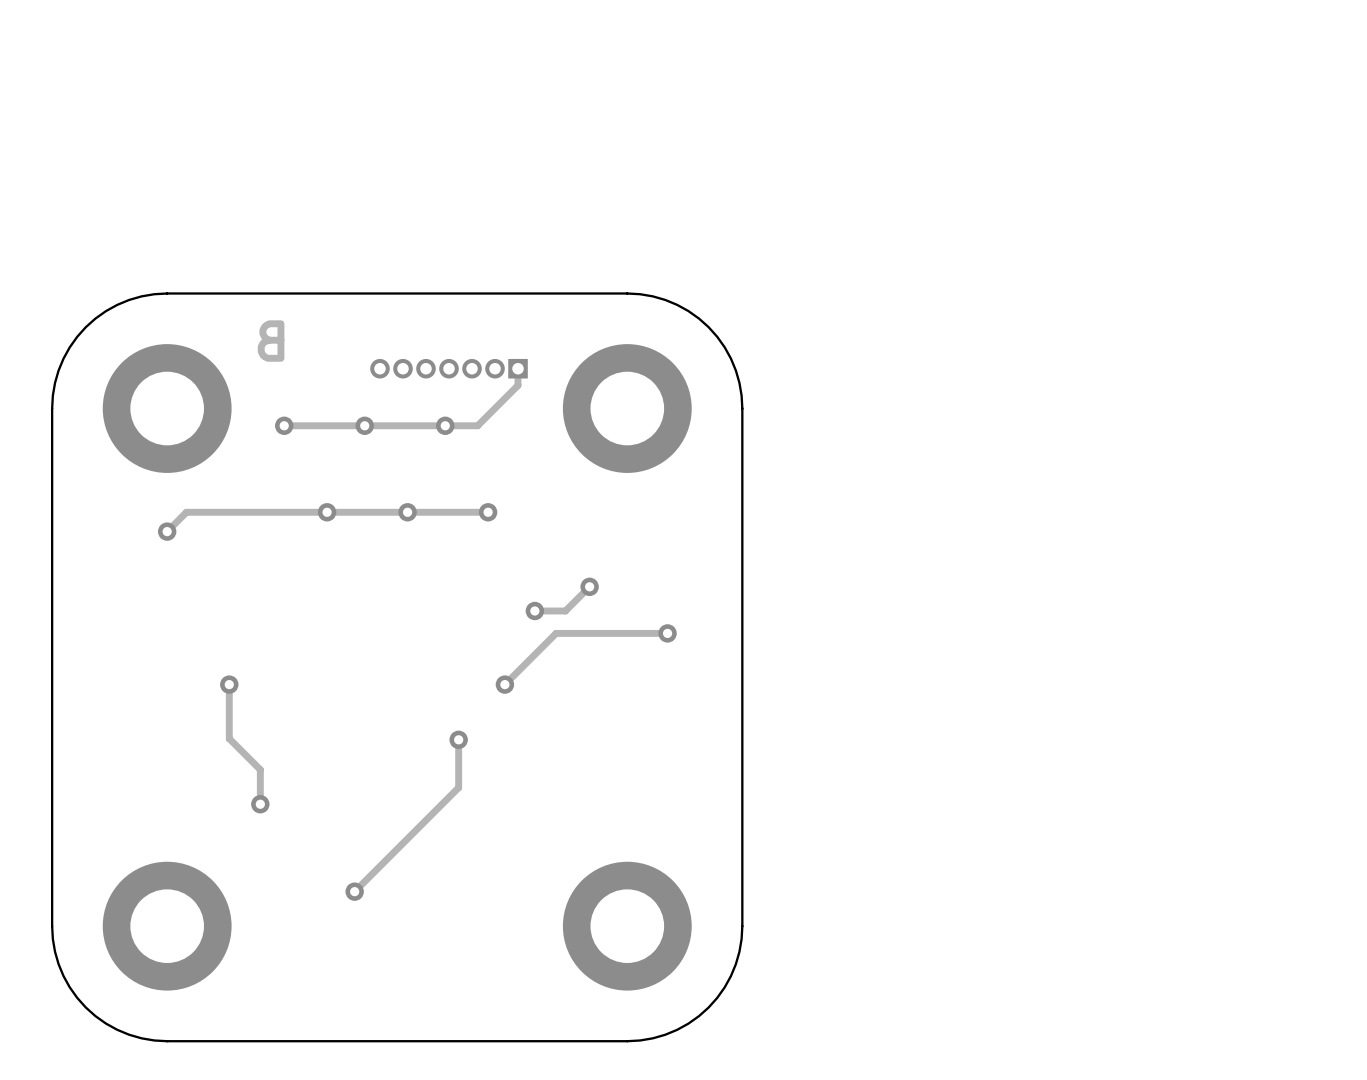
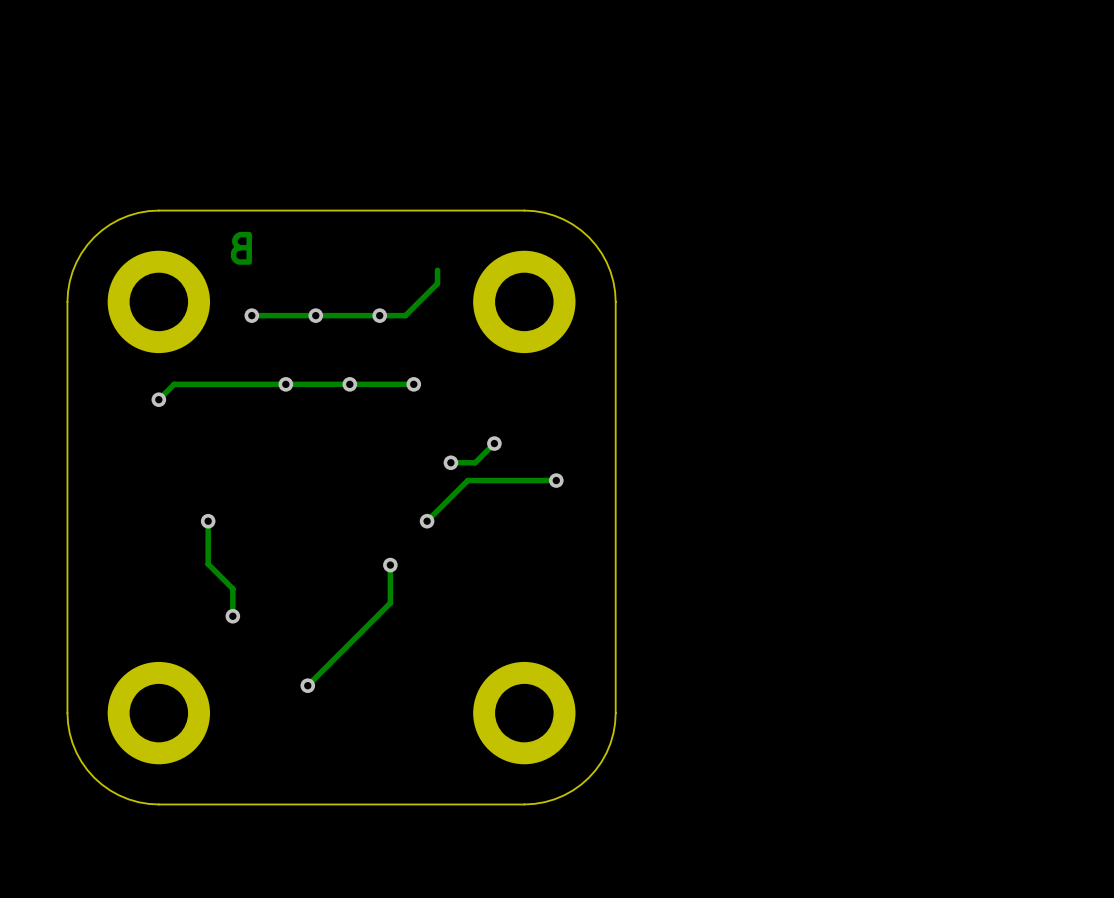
part: (449, 368) -> none

